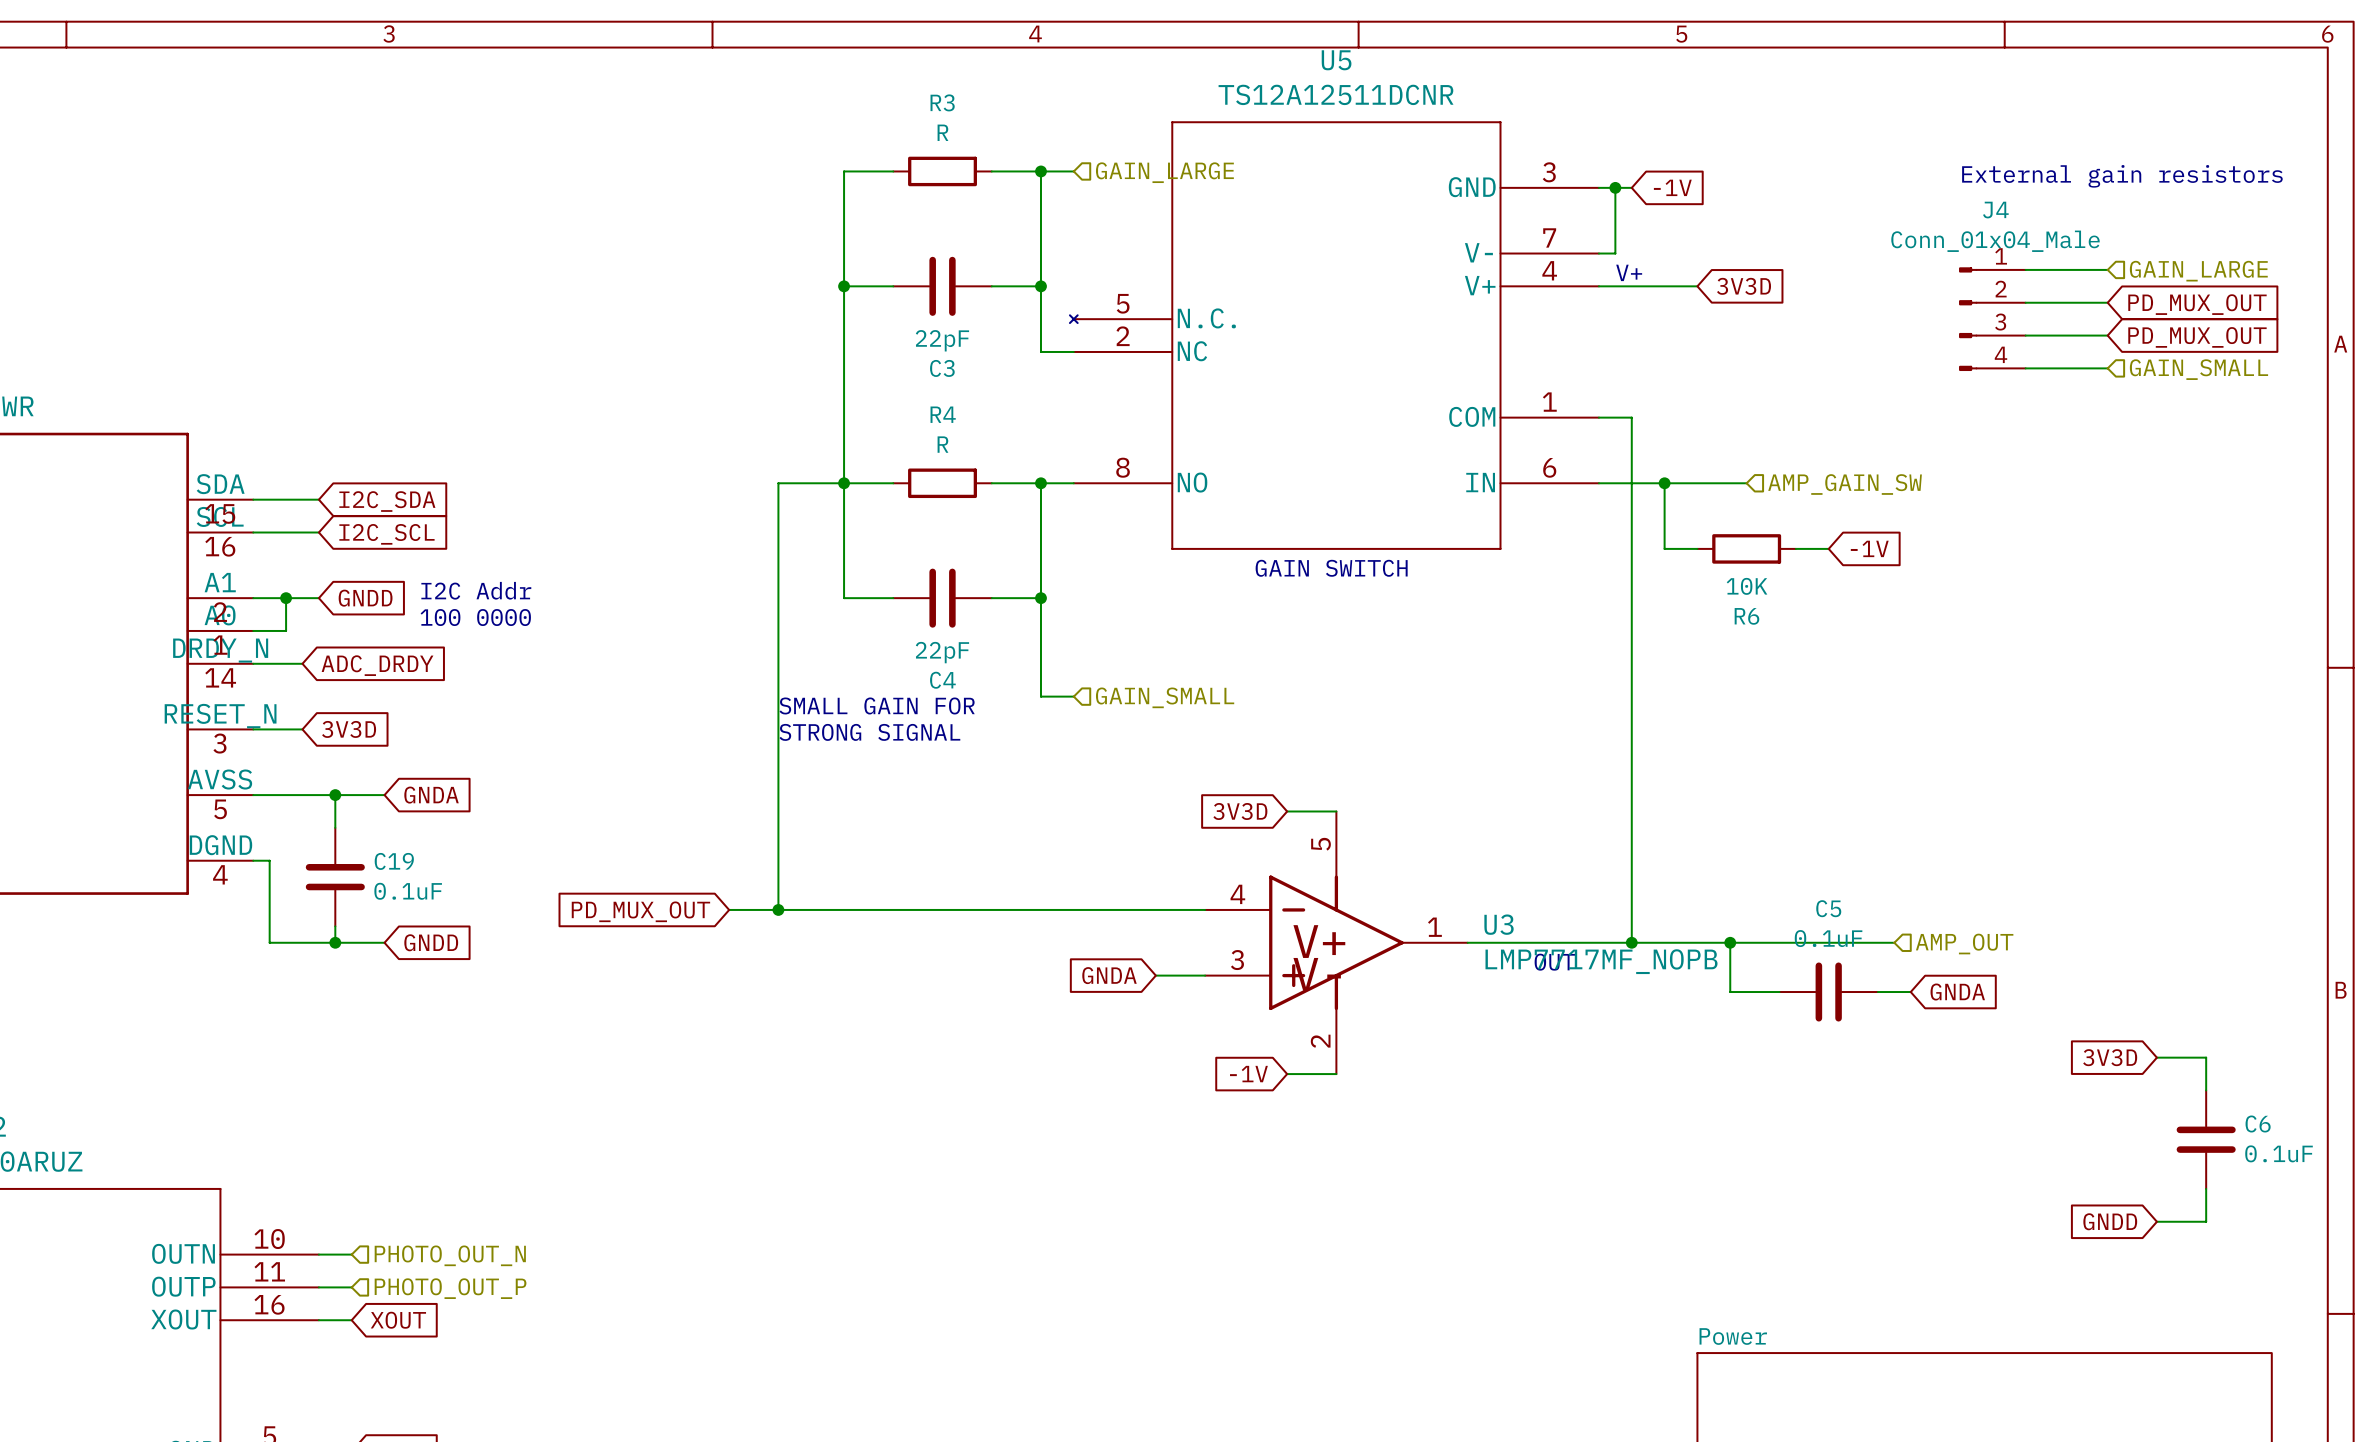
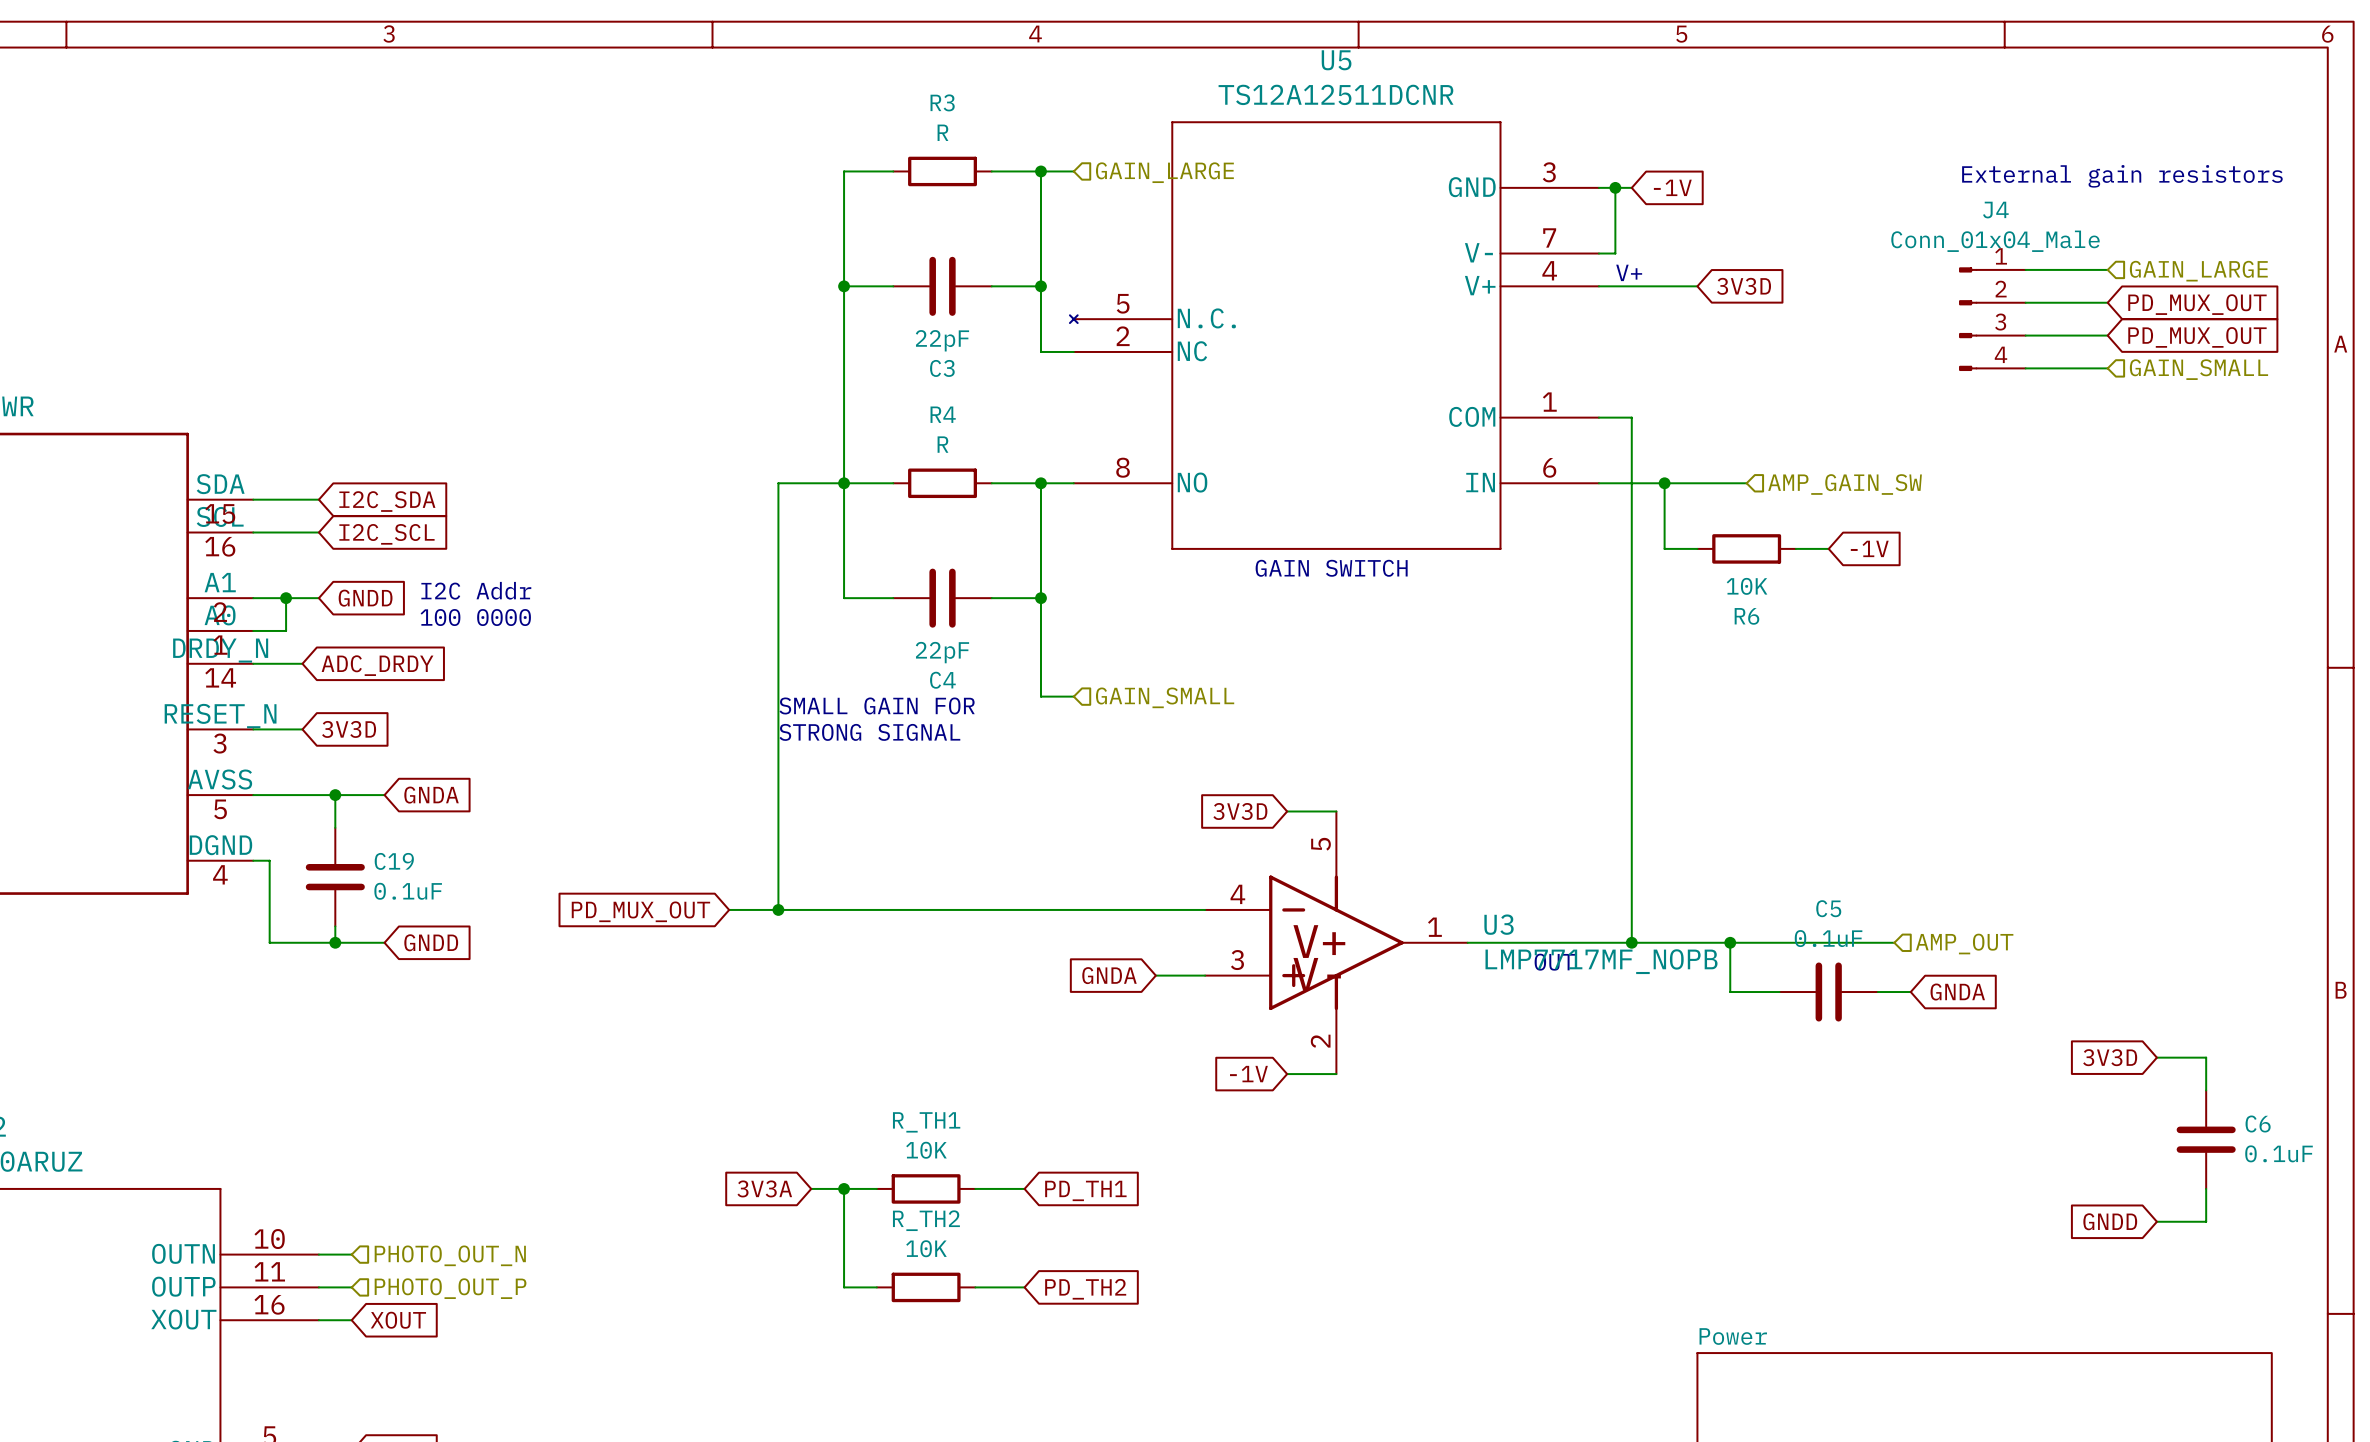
global label: none -> 3V3A (764, 1188)
wire: none -> (811, 1188) (876, 1188)
wire: none -> (844, 1188) (844, 1287) (876, 1287)
junction: none -> (844, 1188)
R_TH1: none -> 10K (926, 1188)
wire: none -> (975, 1188) (1024, 1188)
global label: none -> PD_TH1 (1085, 1190)
R_TH2: none -> 10K (926, 1287)
wire: none -> (975, 1287) (1024, 1287)
global label: none -> PD_TH2 (1085, 1289)

